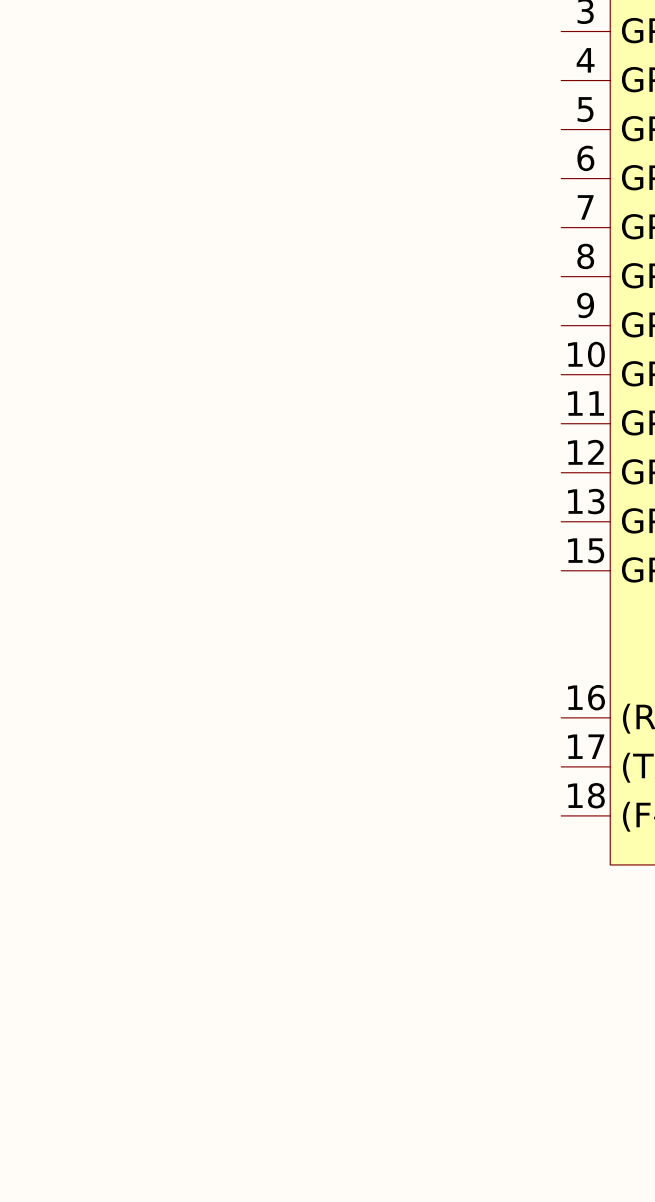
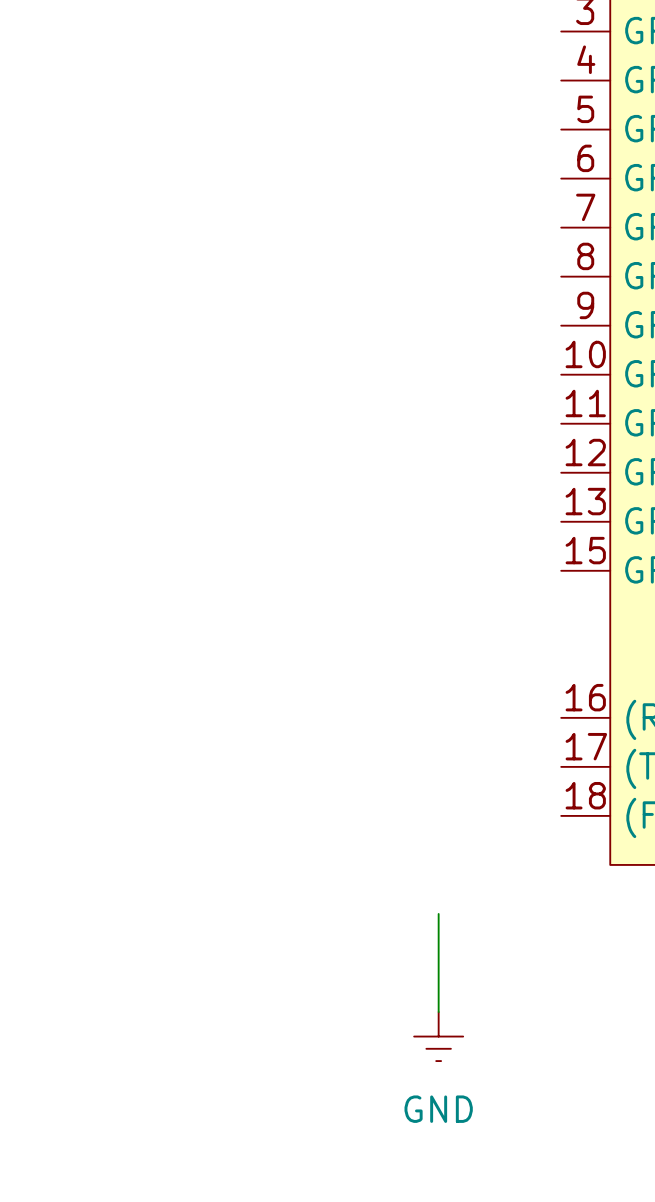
wire: none -> (438, 913) (438, 1012)
power symbol: none -> GND (438, 1036)

